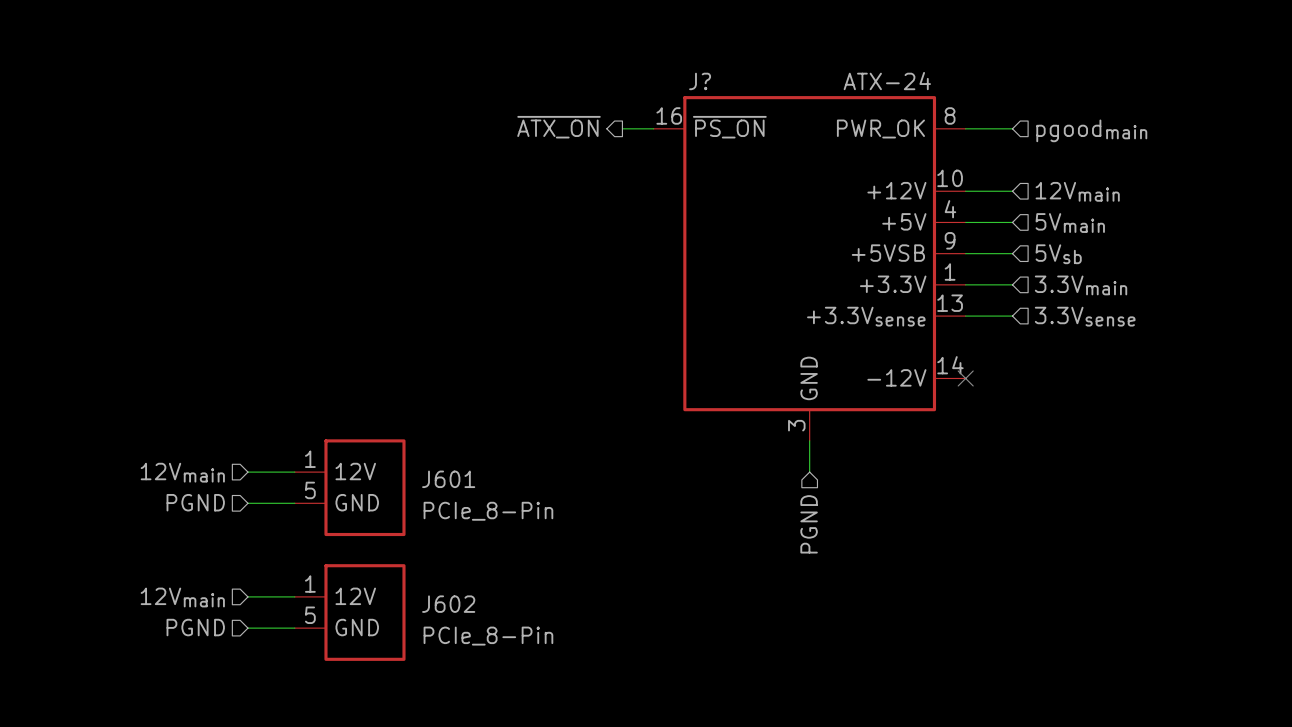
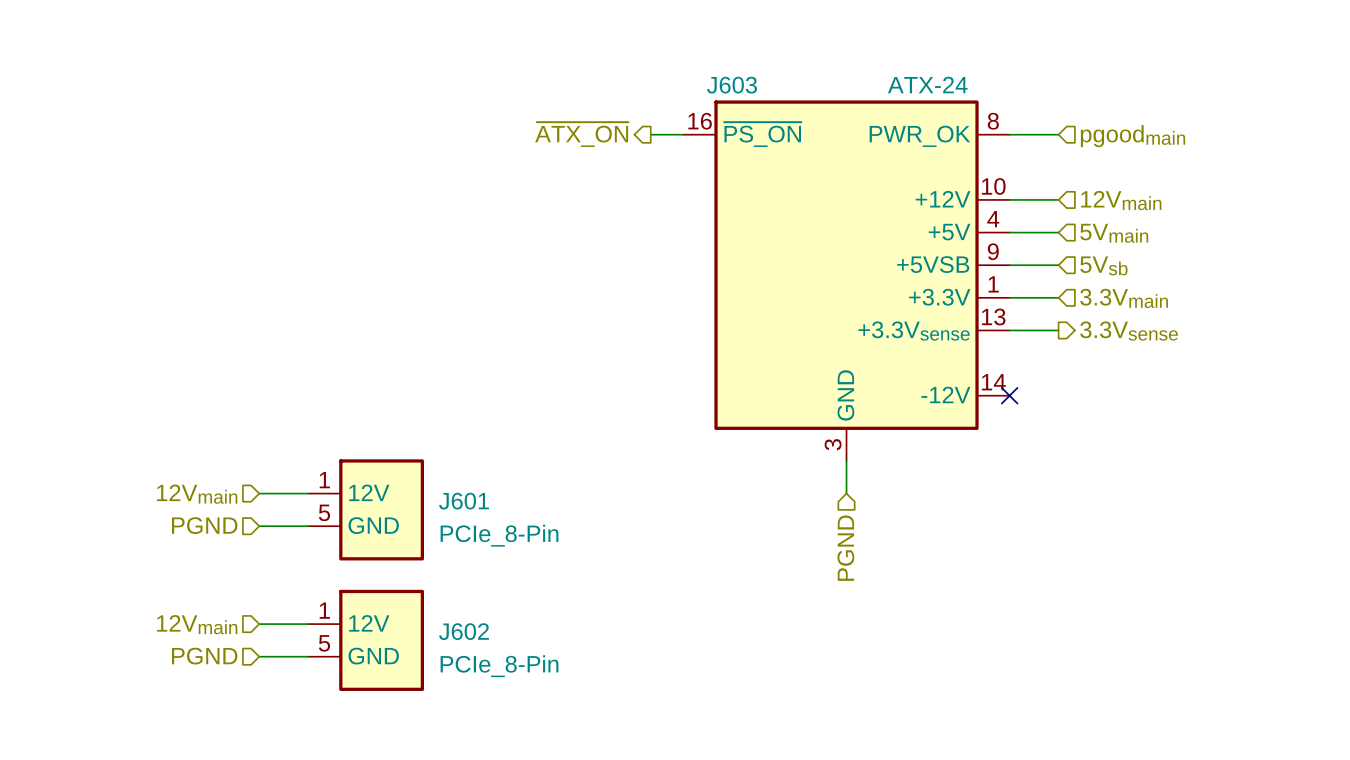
J? name: J? (700, 81) -> J603 (731, 85)
hierarchical label shape: input (1085, 316) -> output (1129, 331)

